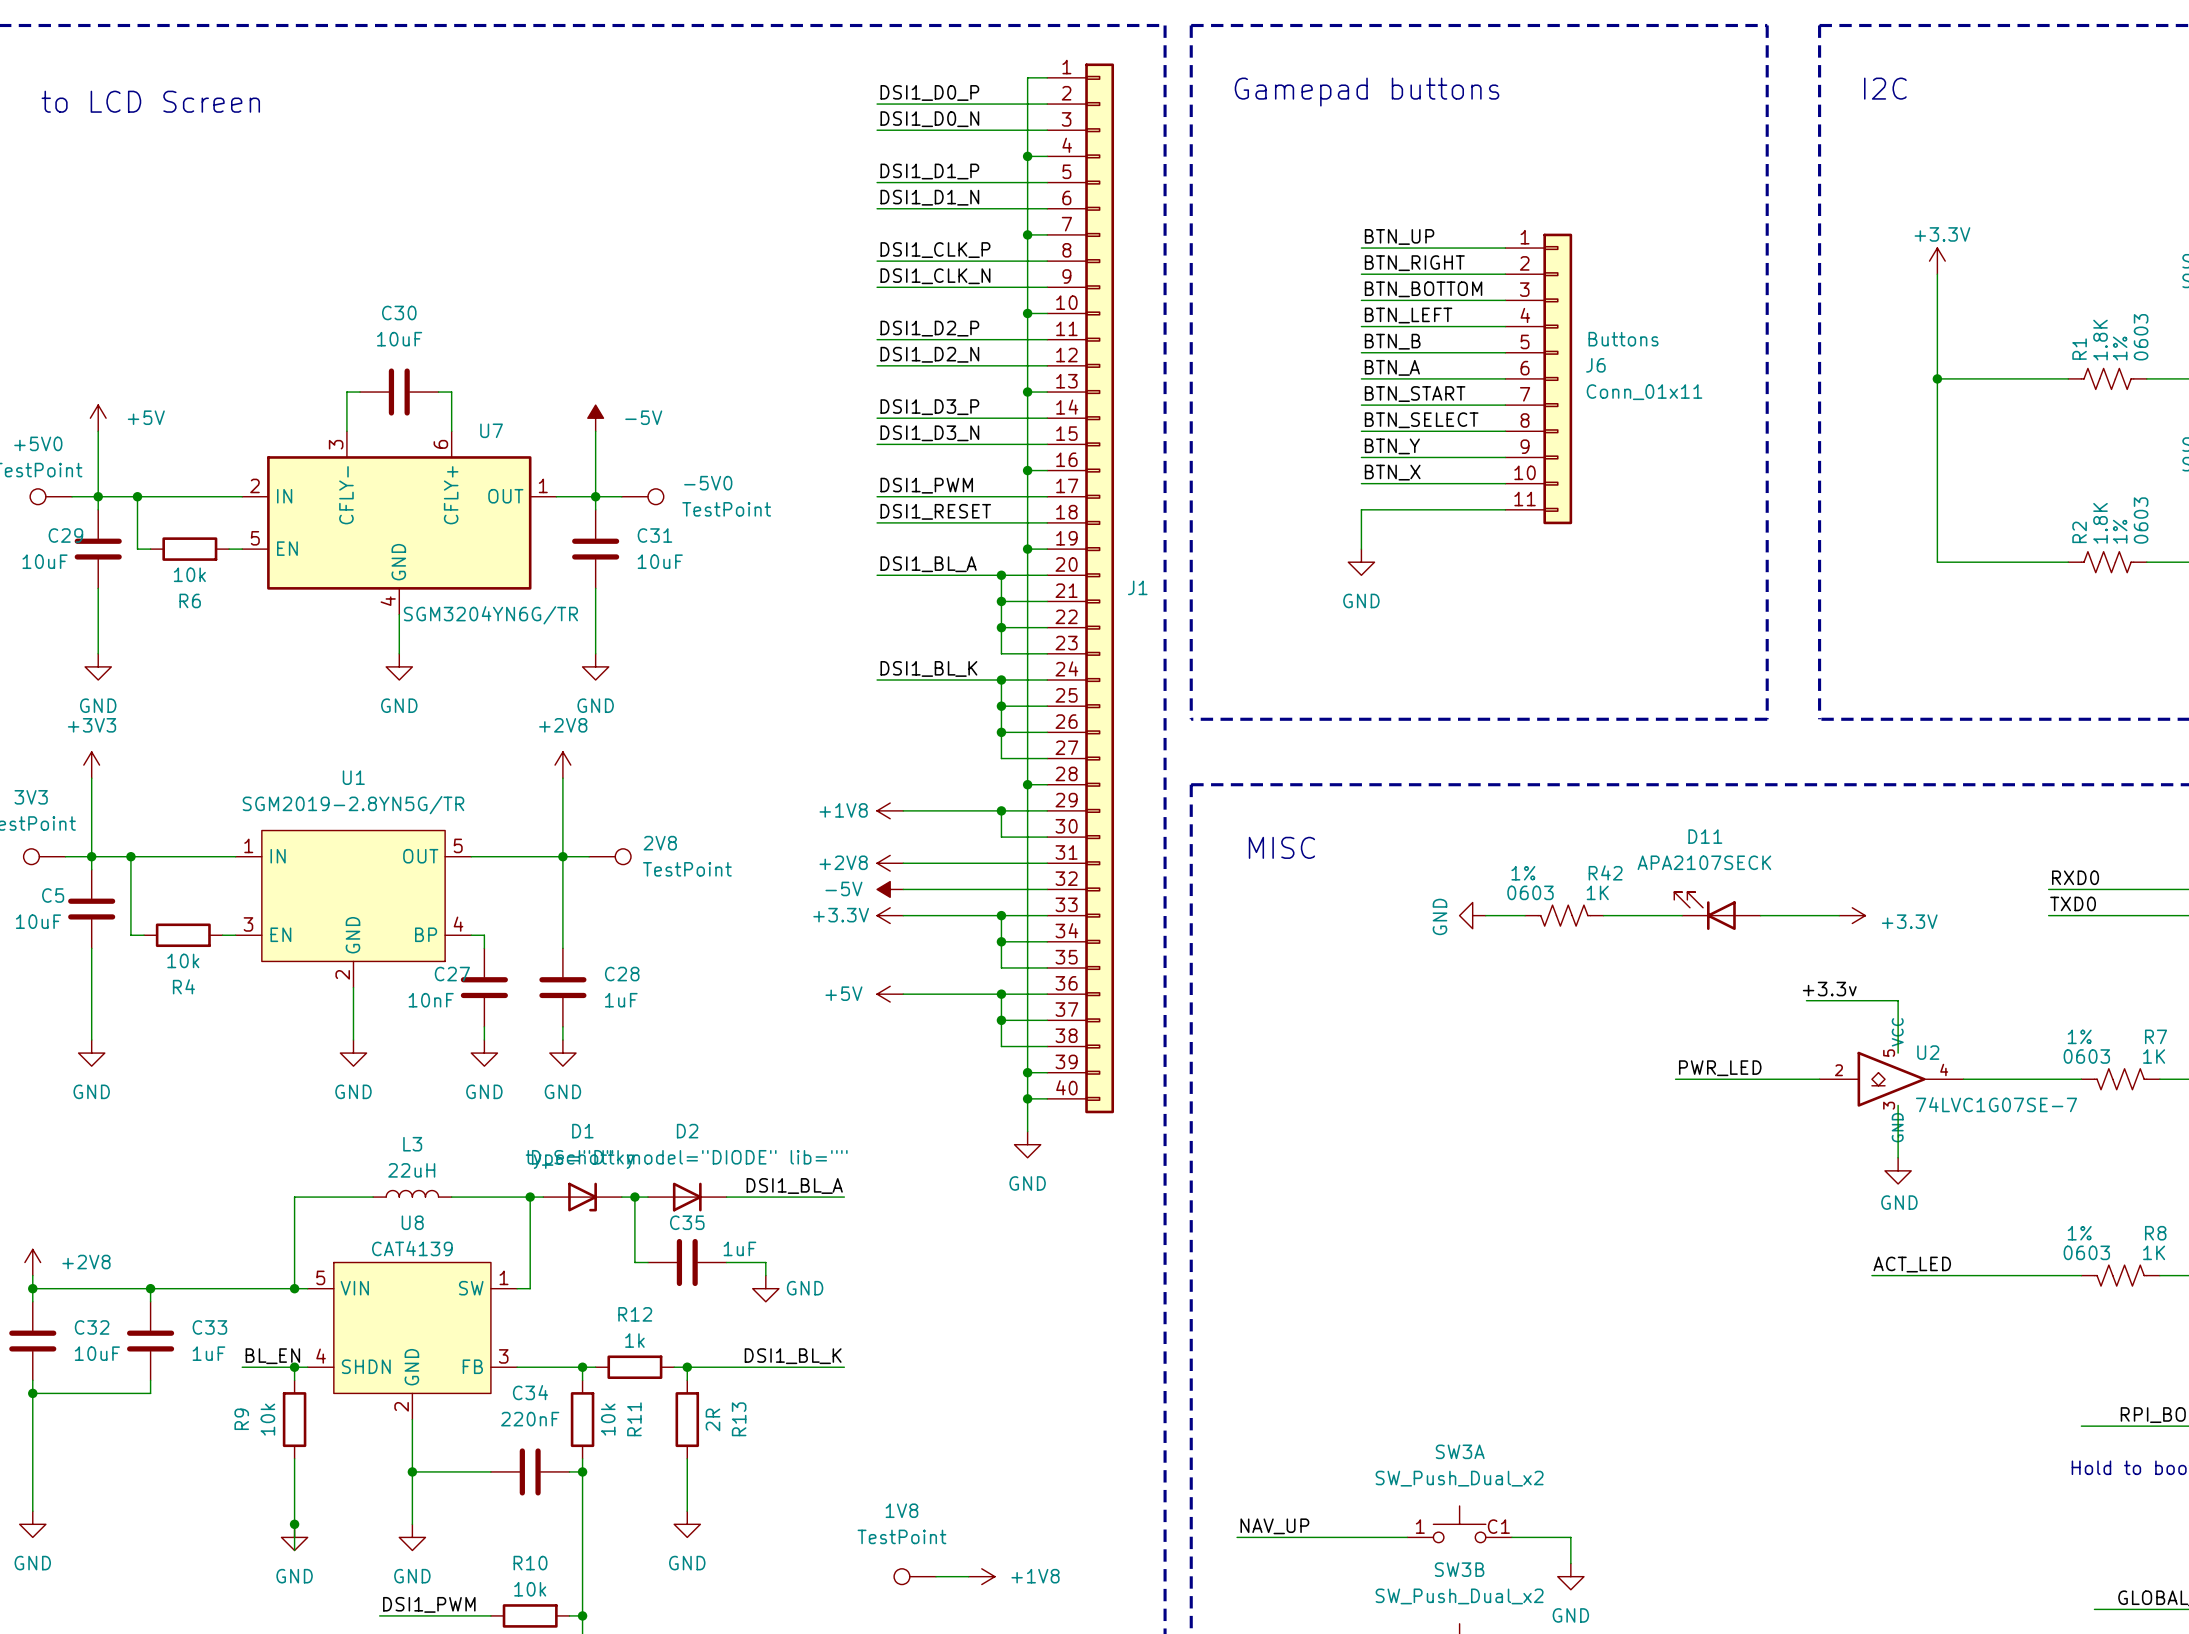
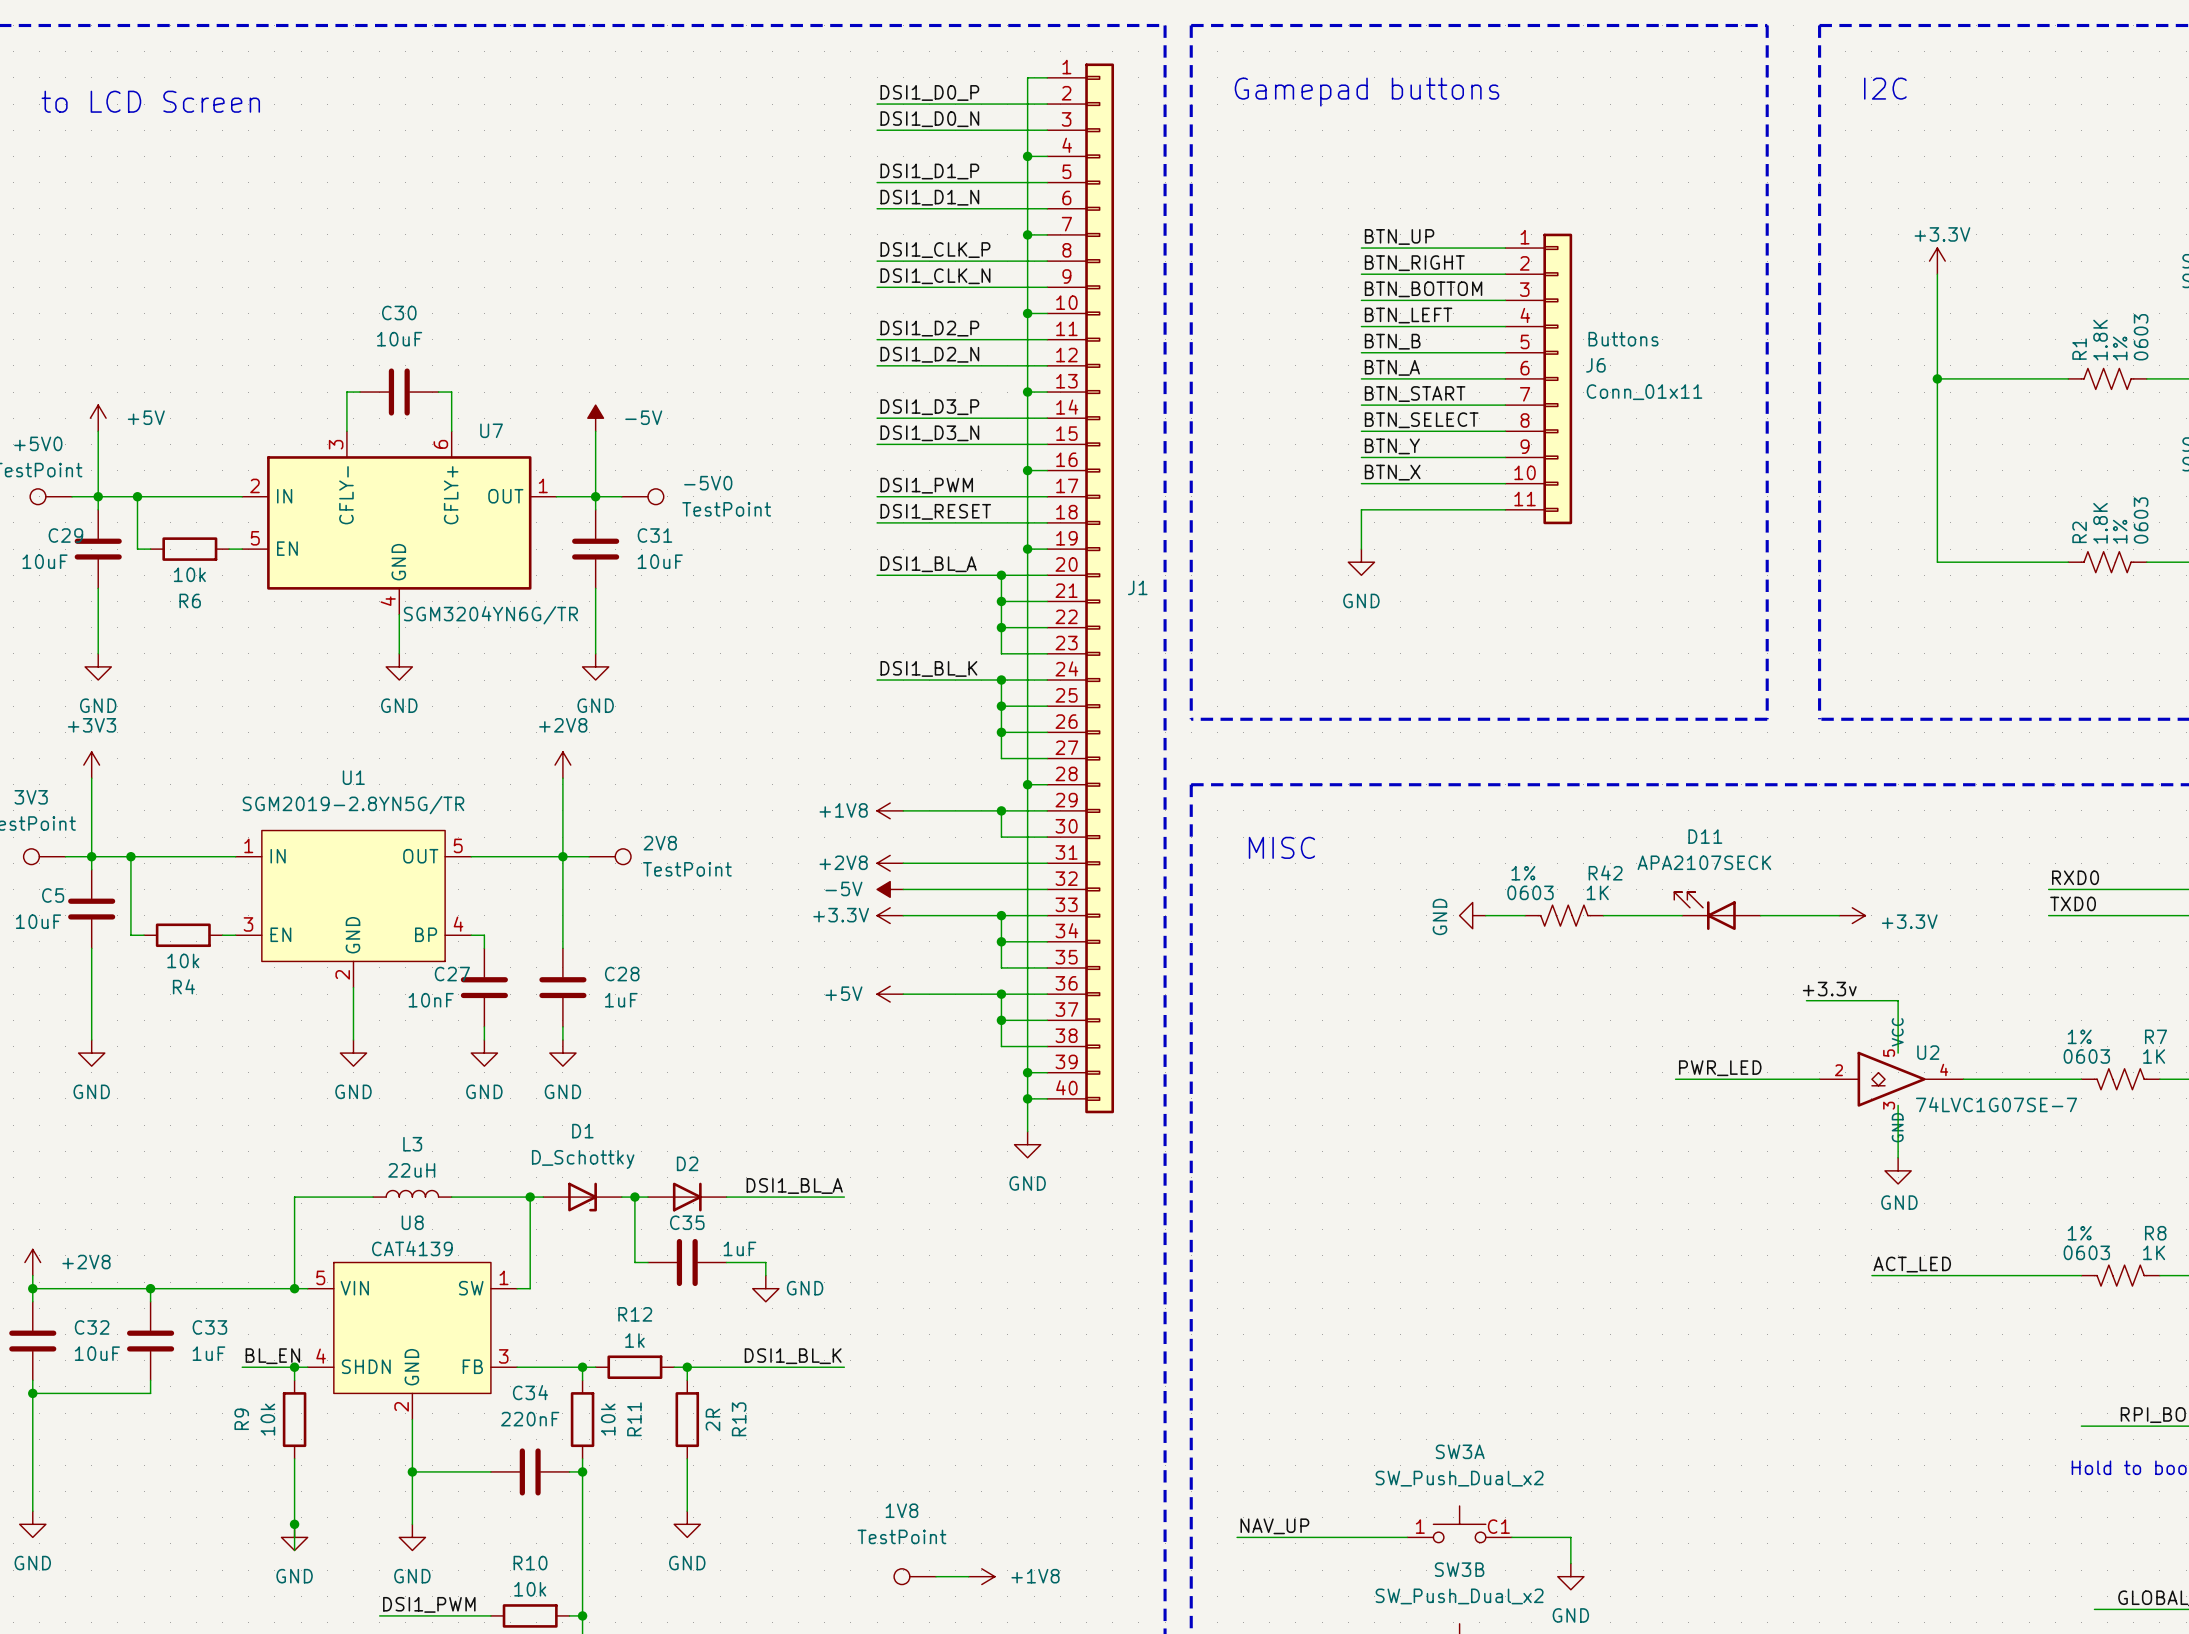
D2 name position: D2 (687, 1131) -> D2 (687, 1163)
D2 value: type="D" model="DIODE" lib="" (686, 1159) -> none

